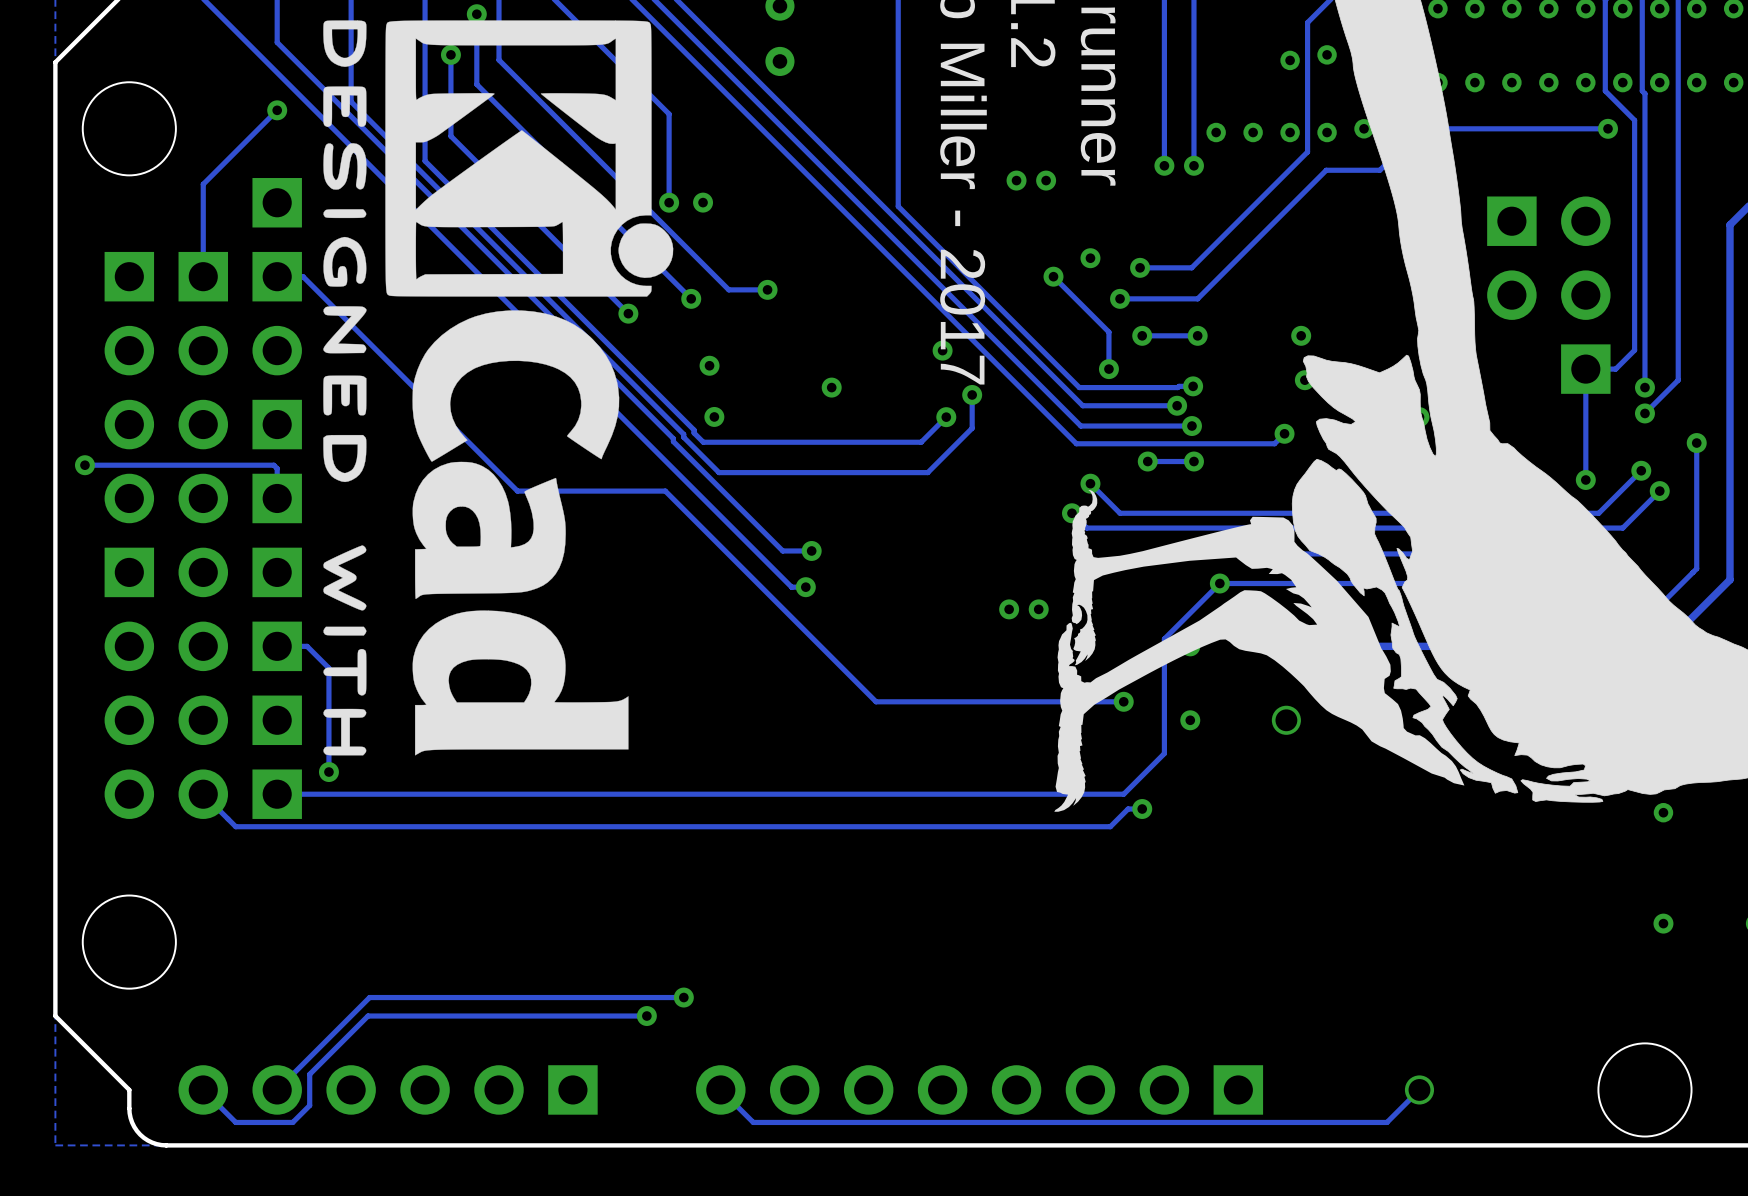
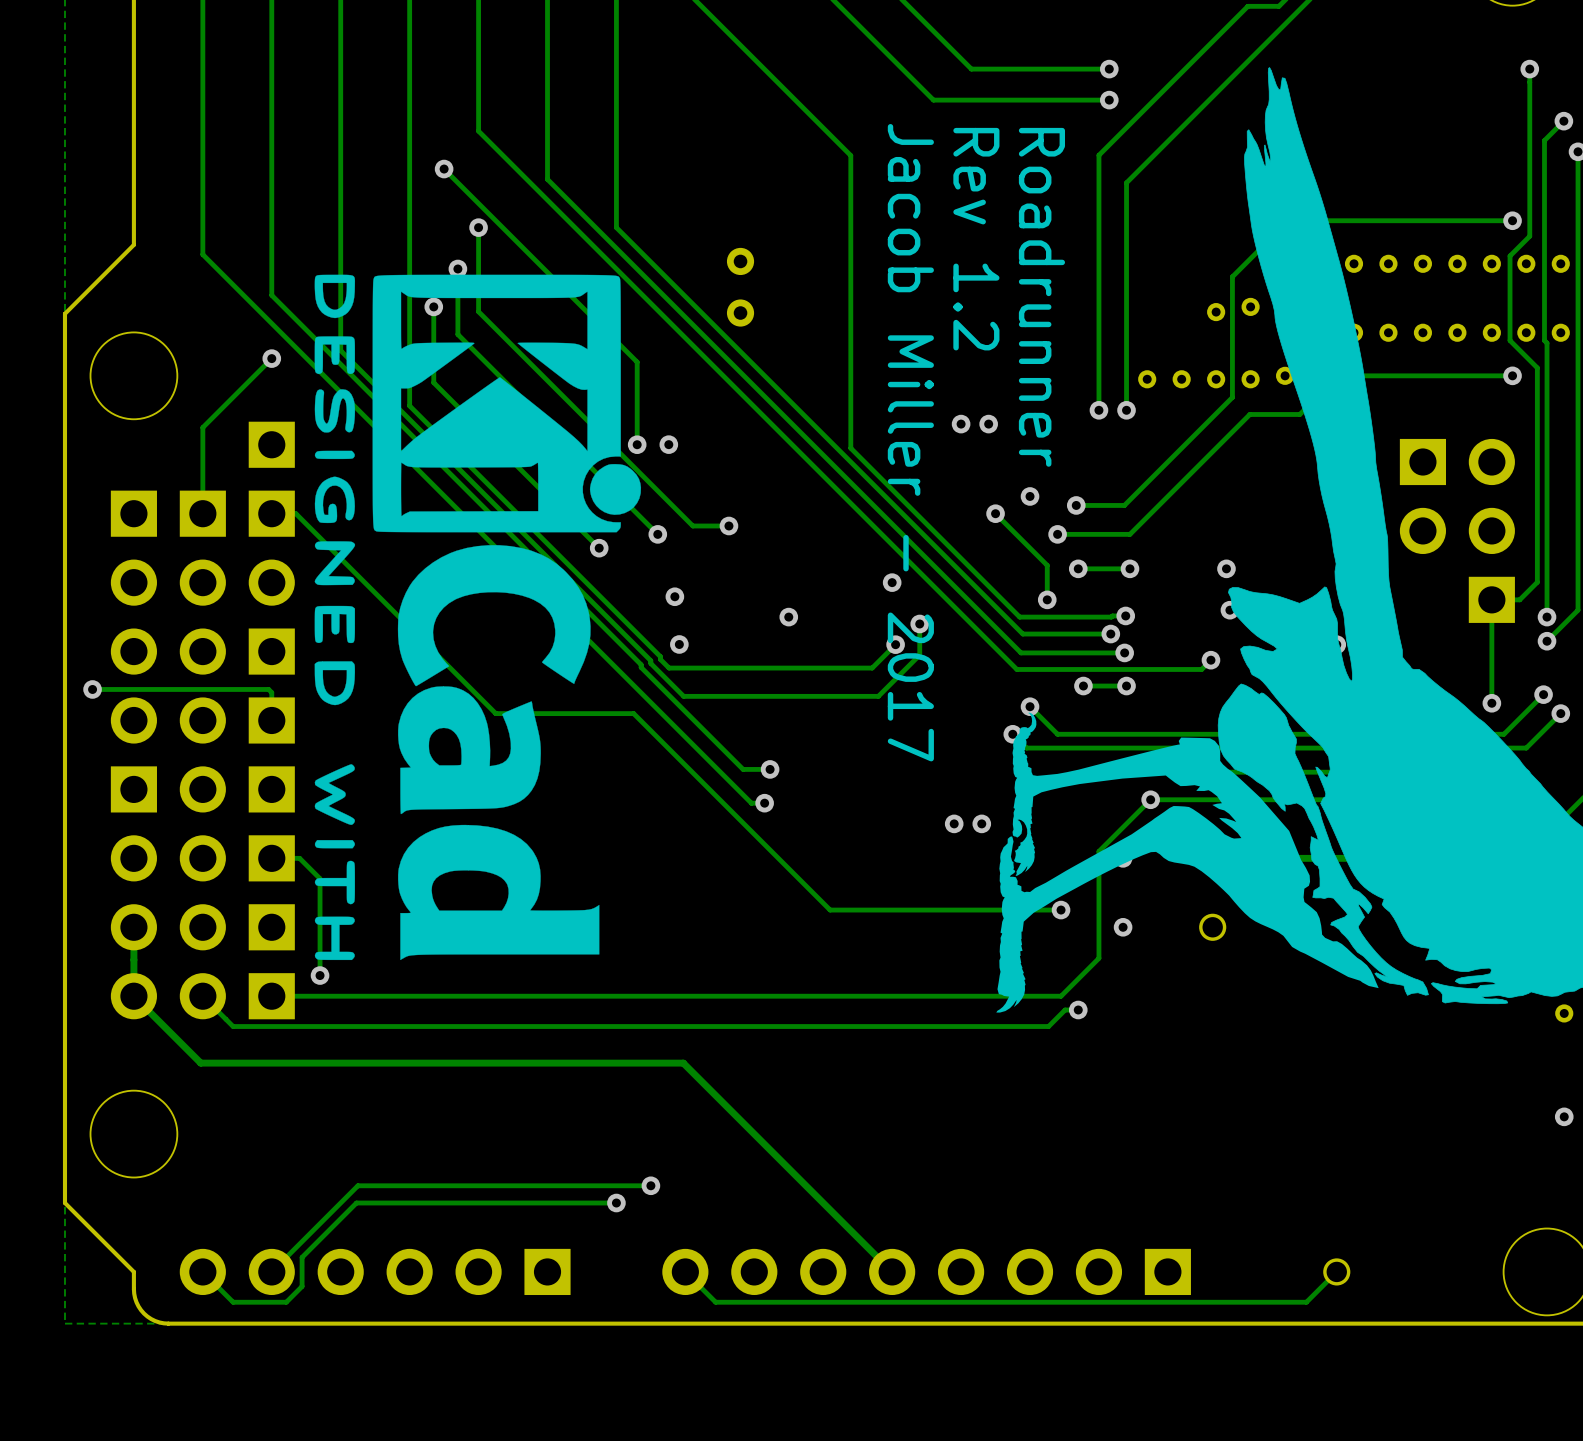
track: none -> (133, 927) (133, 996) (200, 1063) (683, 1063) (892, 1271)

